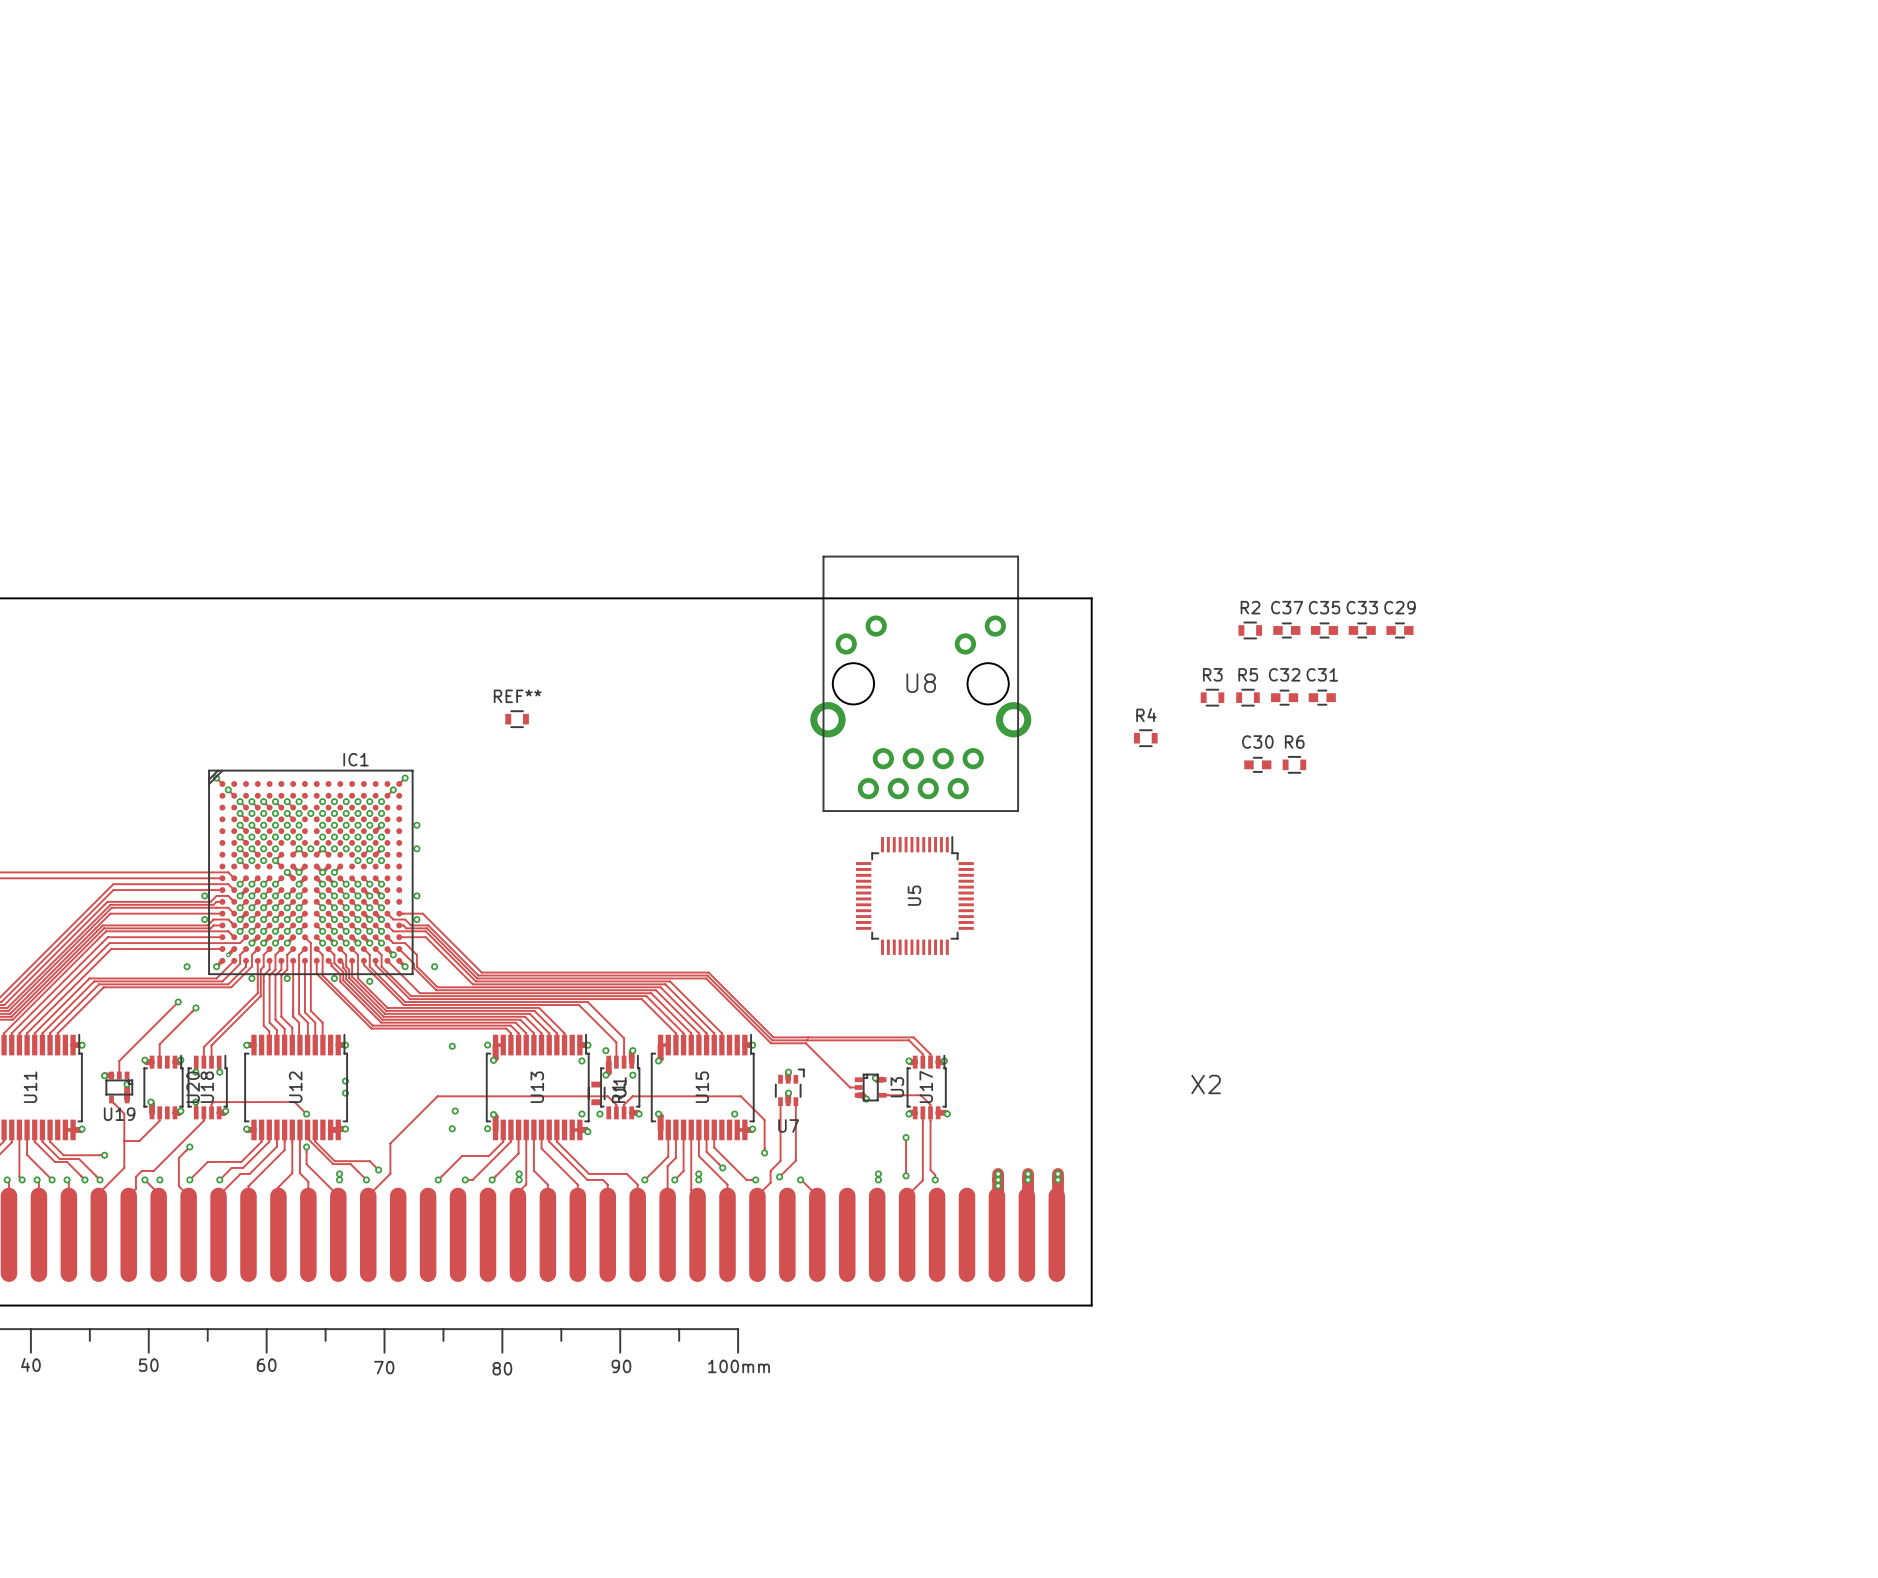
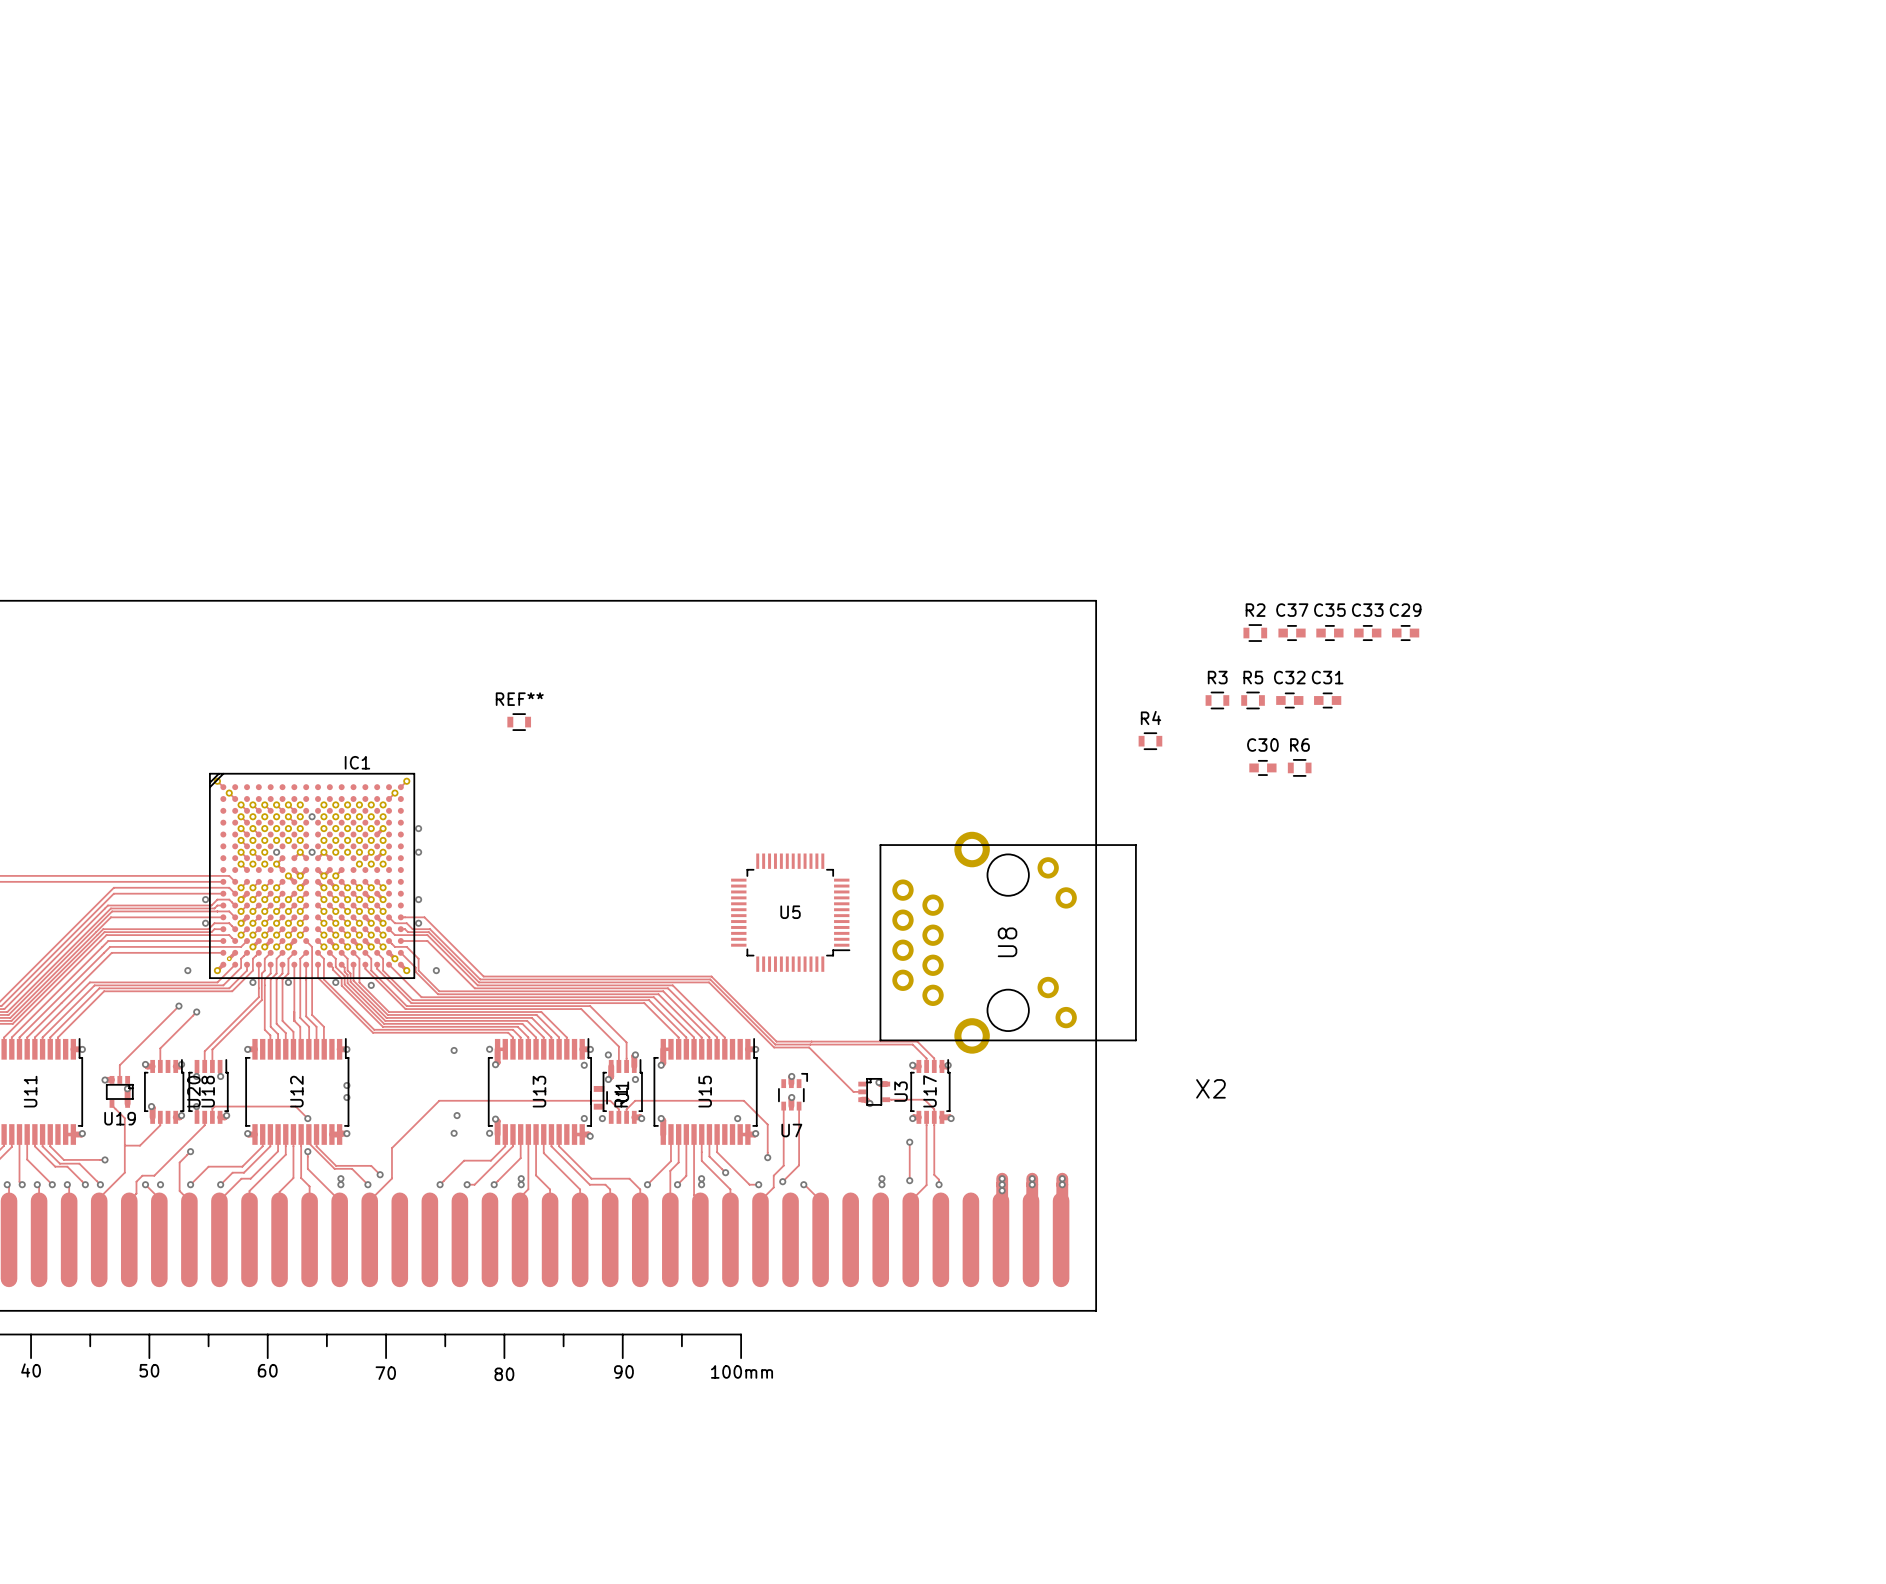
U8 rotation: 0° (920, 683) -> 90° clockwise (1008, 942)
U8 position: (920, 683) -> (1008, 942)
U5 rotation: 0° (914, 895) -> 90° clockwise (790, 912)
U5 position: (914, 895) -> (790, 912)

